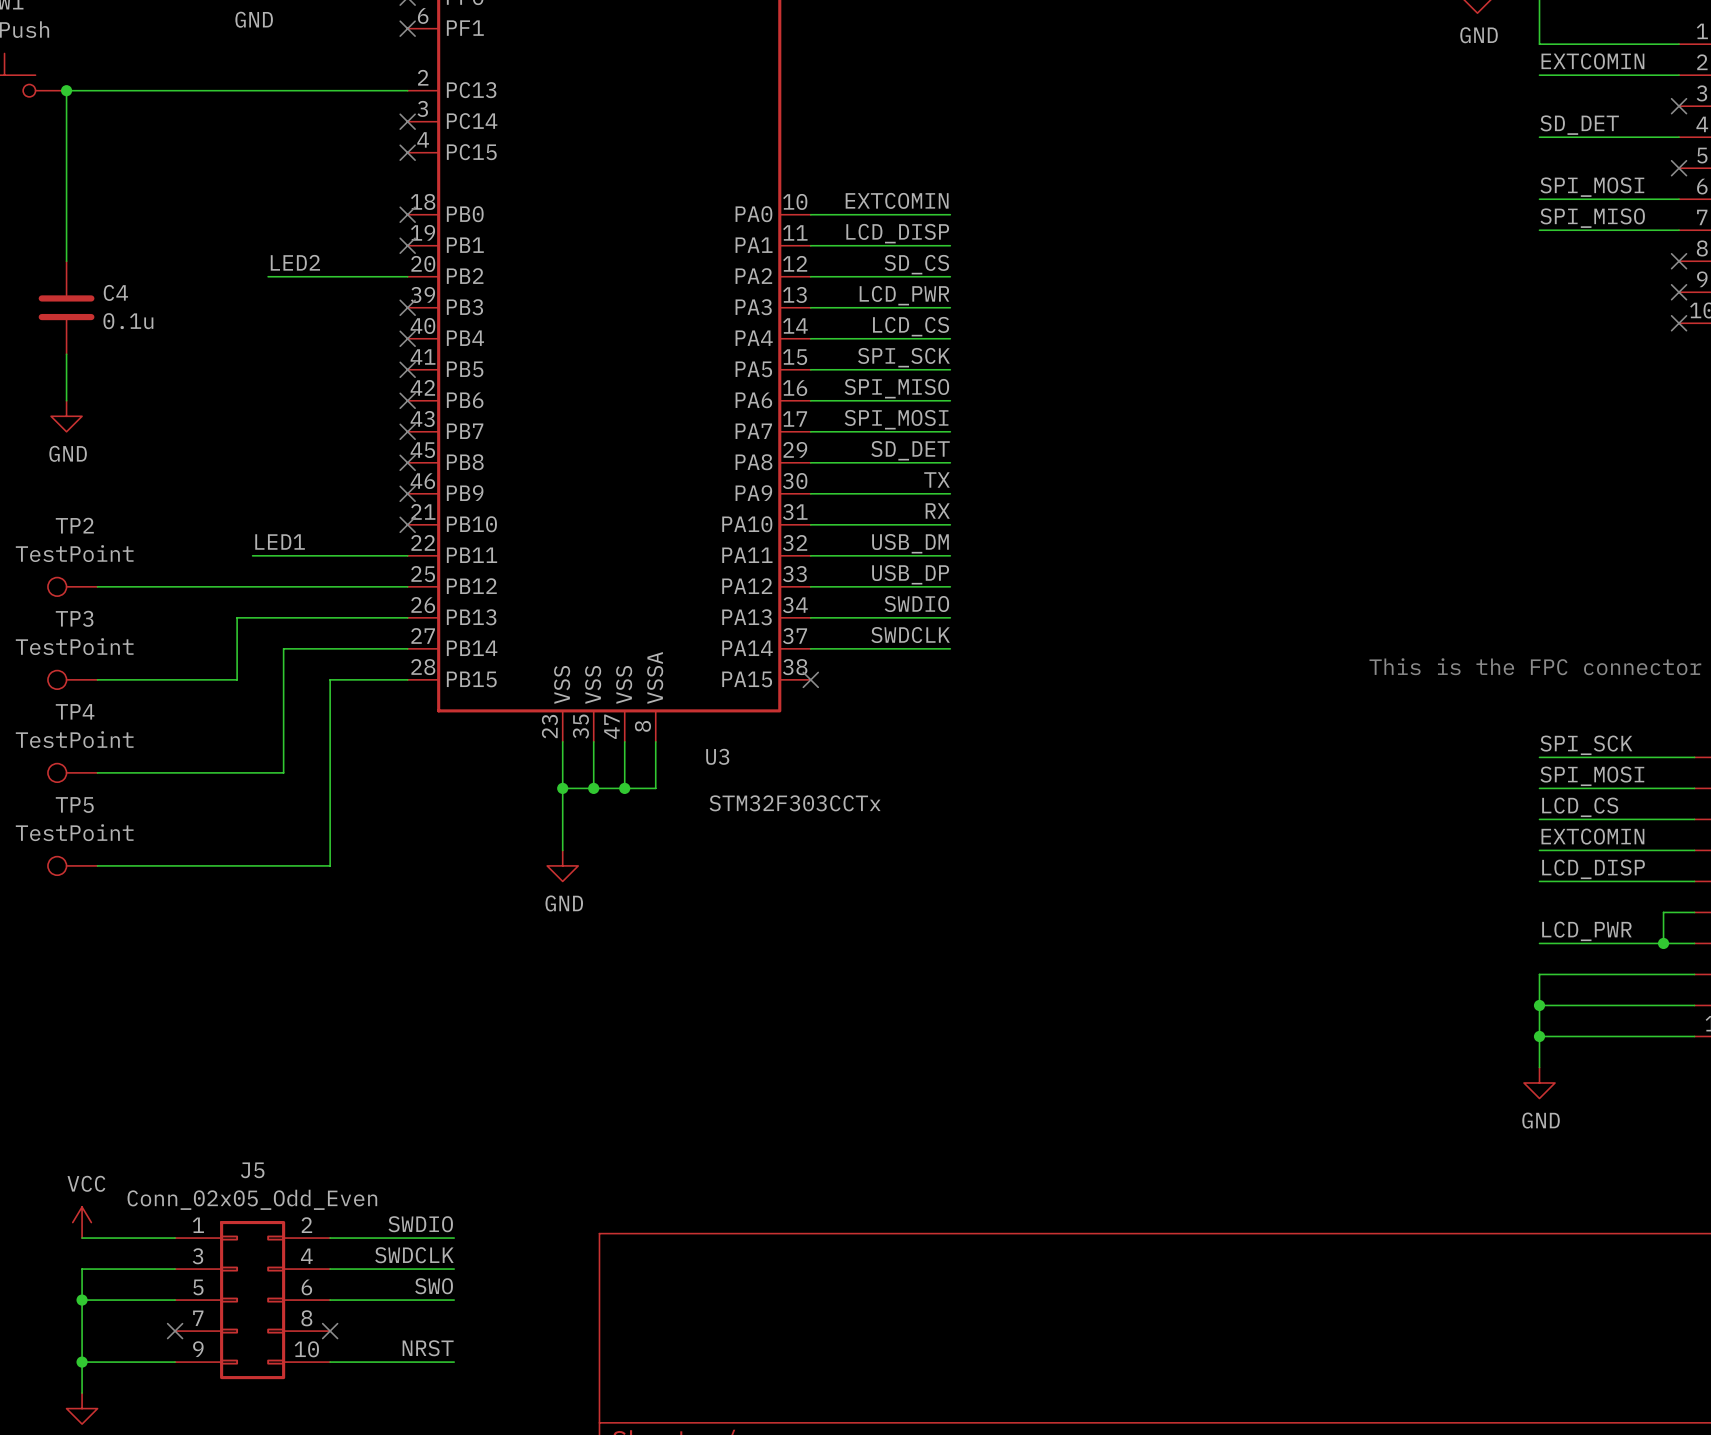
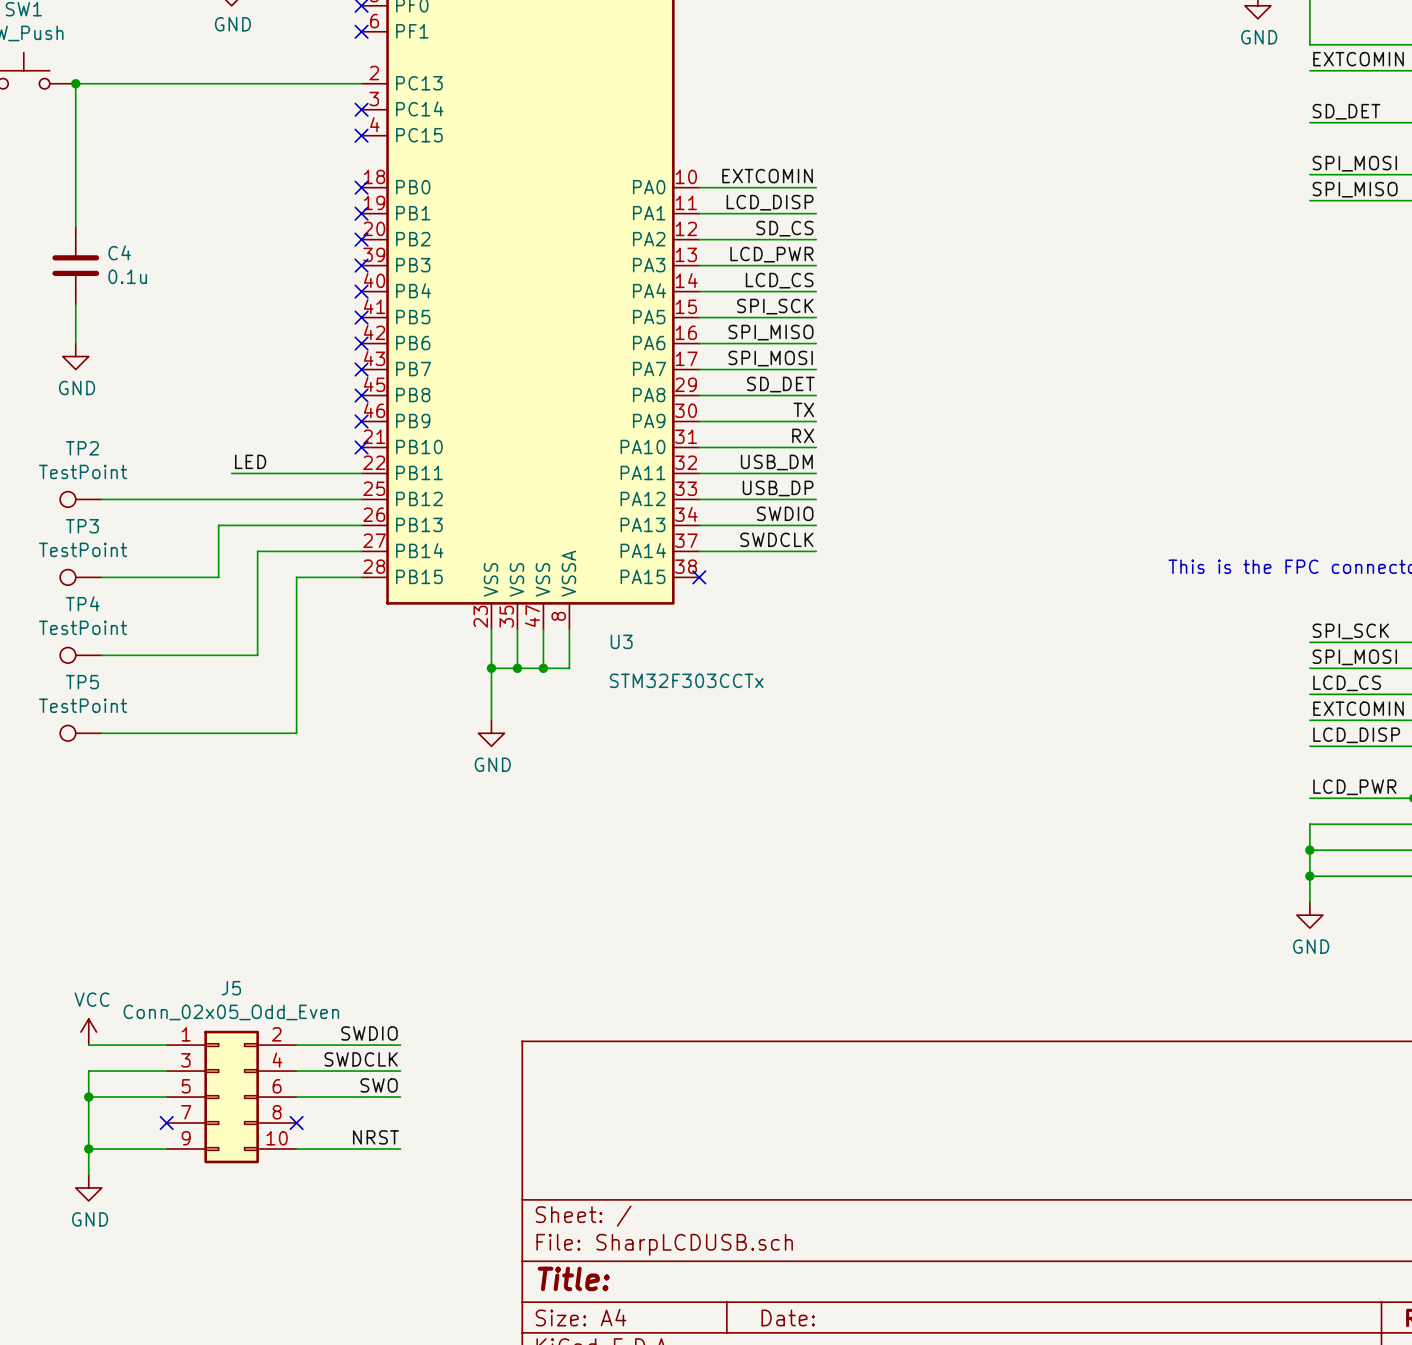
label: LED2 (295, 262) -> none
wire: (268, 276) (407, 276) -> none
no-connect mark: none -> (361, 239)
label: LED1 (280, 542) -> LED (250, 461)

